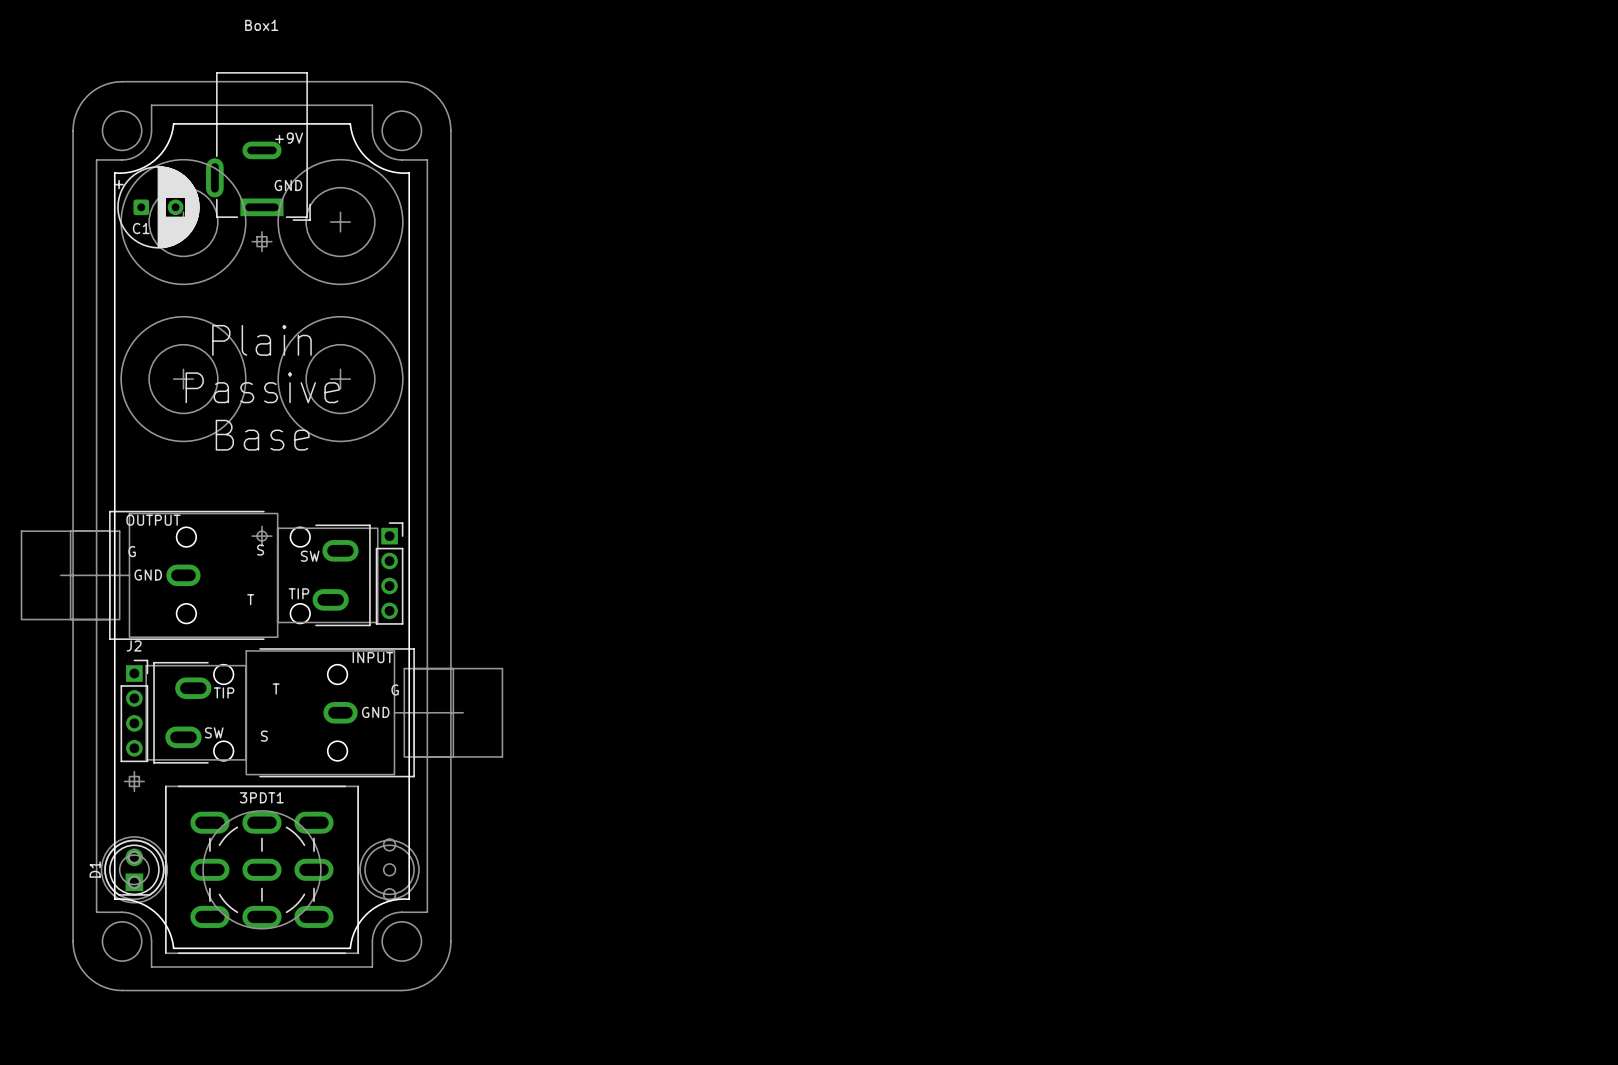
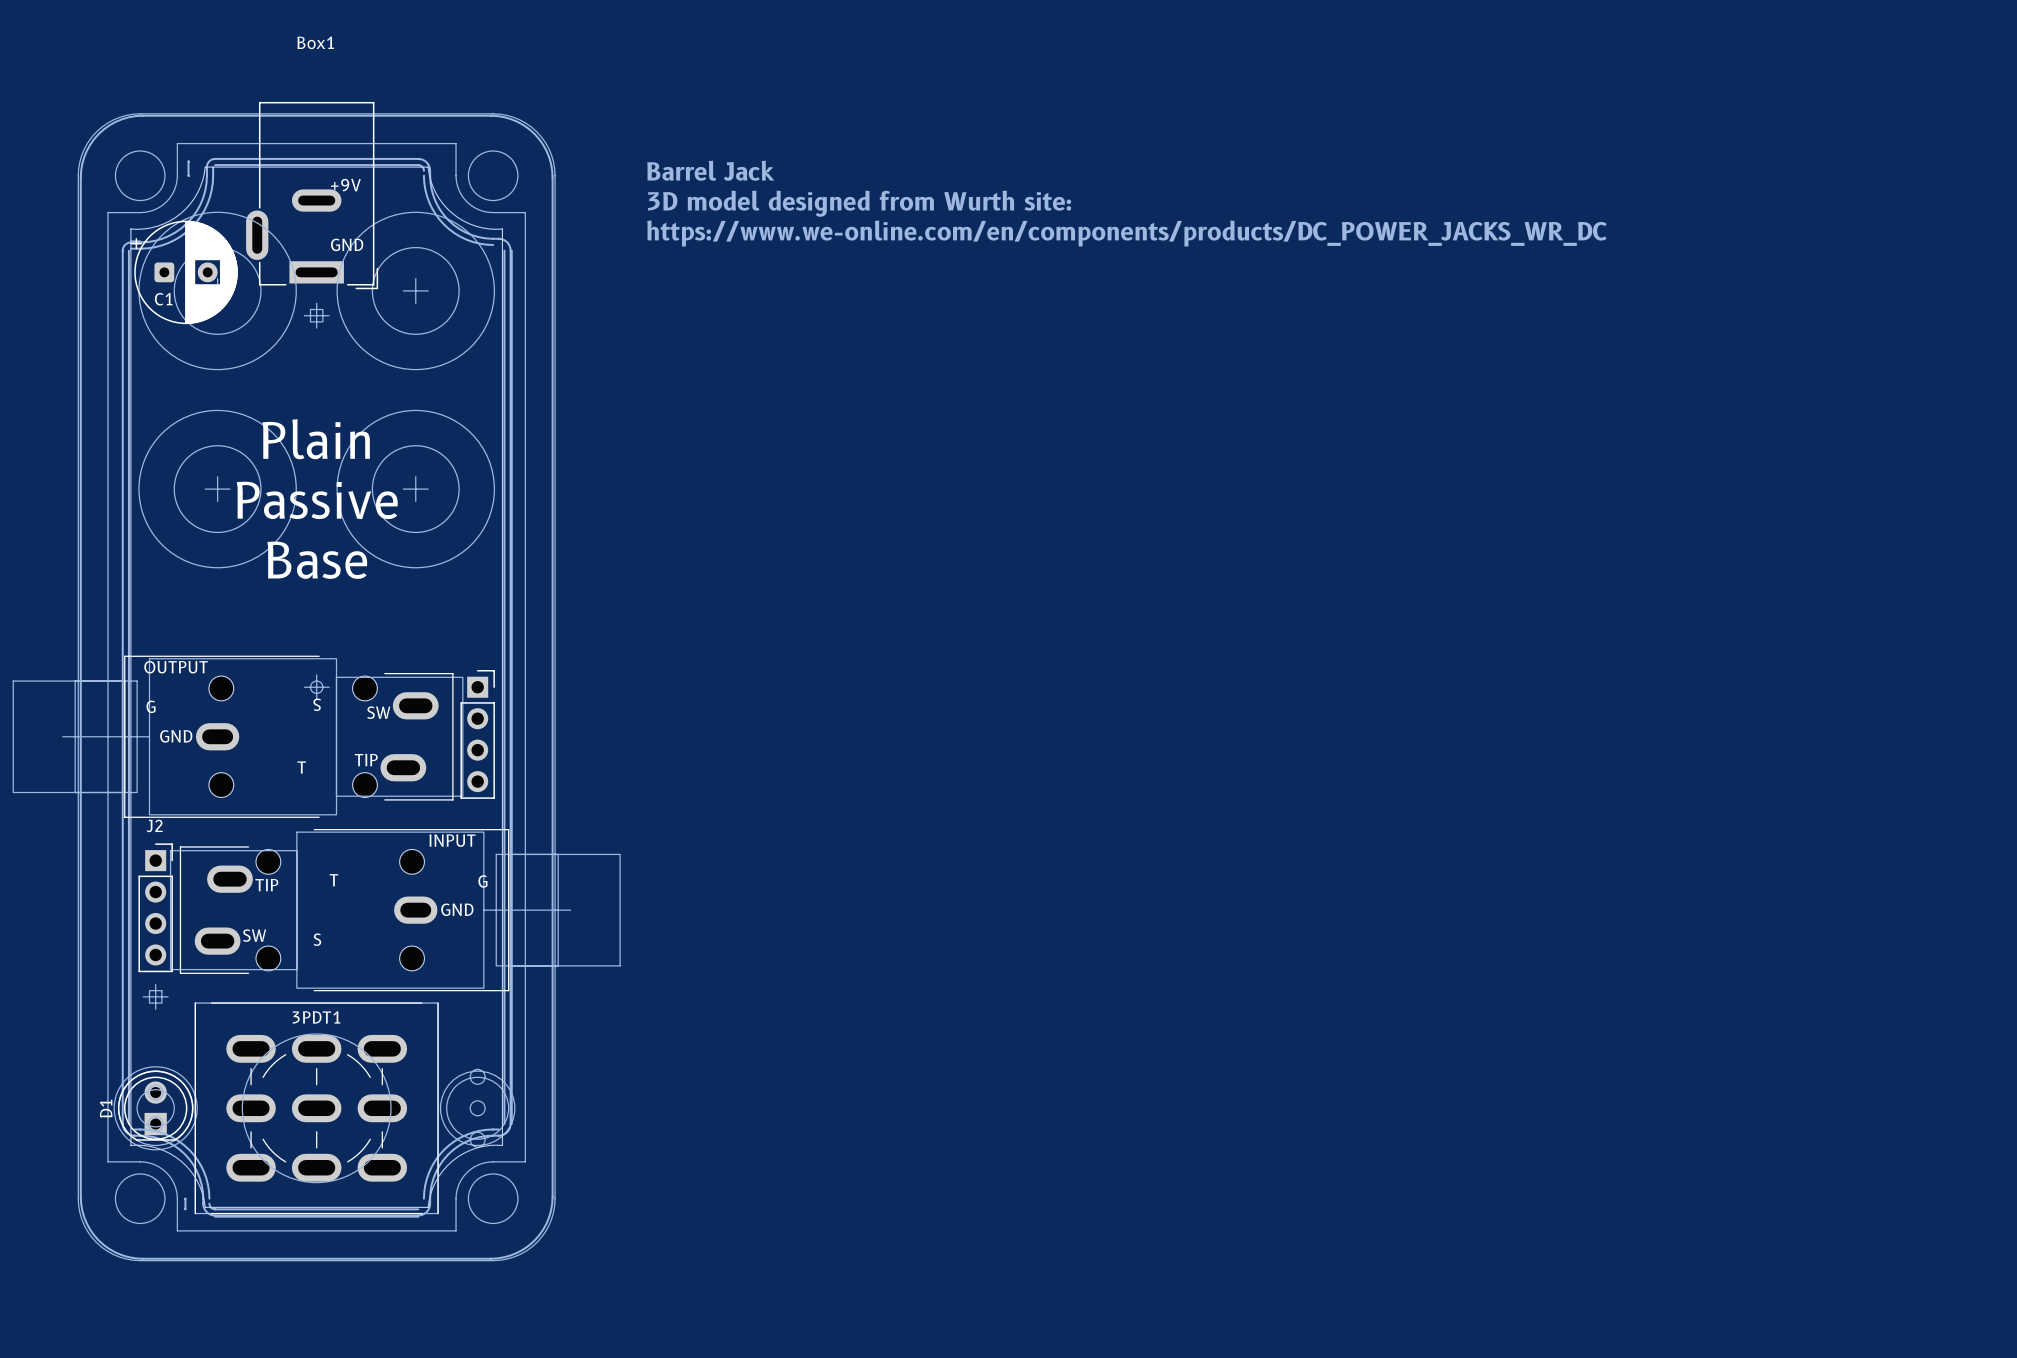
line: none -> (142, 115) (497, 116) (517, 121) (529, 129) (543, 144) (549, 157) (552, 177) (552, 1196) (549, 1217) (543, 1229) (529, 1245) (511, 1255) (490, 1258) (135, 1258) (115, 1252) (104, 1245) (94, 1235) (84, 1217) (80, 1196) (80, 177) (84, 157) (90, 144) (98, 133) (109, 125) (122, 119) (142, 115)
line: none -> (215, 158) (422, 159) (429, 166) (431, 189) (436, 203) (448, 220) (459, 229) (472, 235) (503, 239) (510, 248) (510, 1125) (503, 1134) (472, 1139) (459, 1145) (448, 1154) (439, 1165) (433, 1177) (428, 1208) (420, 1215) (211, 1214) (203, 1207) (201, 1184) (197, 1171) (184, 1154) (173, 1145) (161, 1139) (129, 1134) (123, 1126) (122, 249) (128, 242) (155, 240) (169, 235) (187, 222) (196, 211) (203, 197) (207, 163) (215, 158)
line: none -> (189, 161) (189, 175)
line: none -> (215, 165) (418, 165) (422, 166) (423, 170)
line: none -> (213, 167) (210, 196) (204, 210) (191, 227) (174, 240) (161, 245) (130, 248)
text: none -> Barrel Jack (710, 170)
line: none -> (423, 175) (429, 202) (444, 224) (466, 239) (493, 244)
text: none -> 3D model designed from Wurth site: (859, 203)
text: none -> https://www.we-online.com/en/components/products/DC_POWER_JACKS_WR_DC (1127, 233)
line: none -> (130, 241) (140, 241)
line: none -> (128, 250) (128, 1123)
line: none -> (504, 250) (504, 1123)
line: none -> (511, 250) (511, 1123)
line: none -> (134, 1129) (153, 1130) (166, 1134) (189, 1149) (204, 1172) (209, 1198)
line: none -> (498, 1129) (479, 1130) (466, 1134) (444, 1149) (429, 1172) (423, 1198)
line: none -> (184, 1198) (184, 1209)
line: none -> (209, 1203) (211, 1207) (215, 1209) (418, 1209)
line: none -> (215, 1216) (418, 1216)

